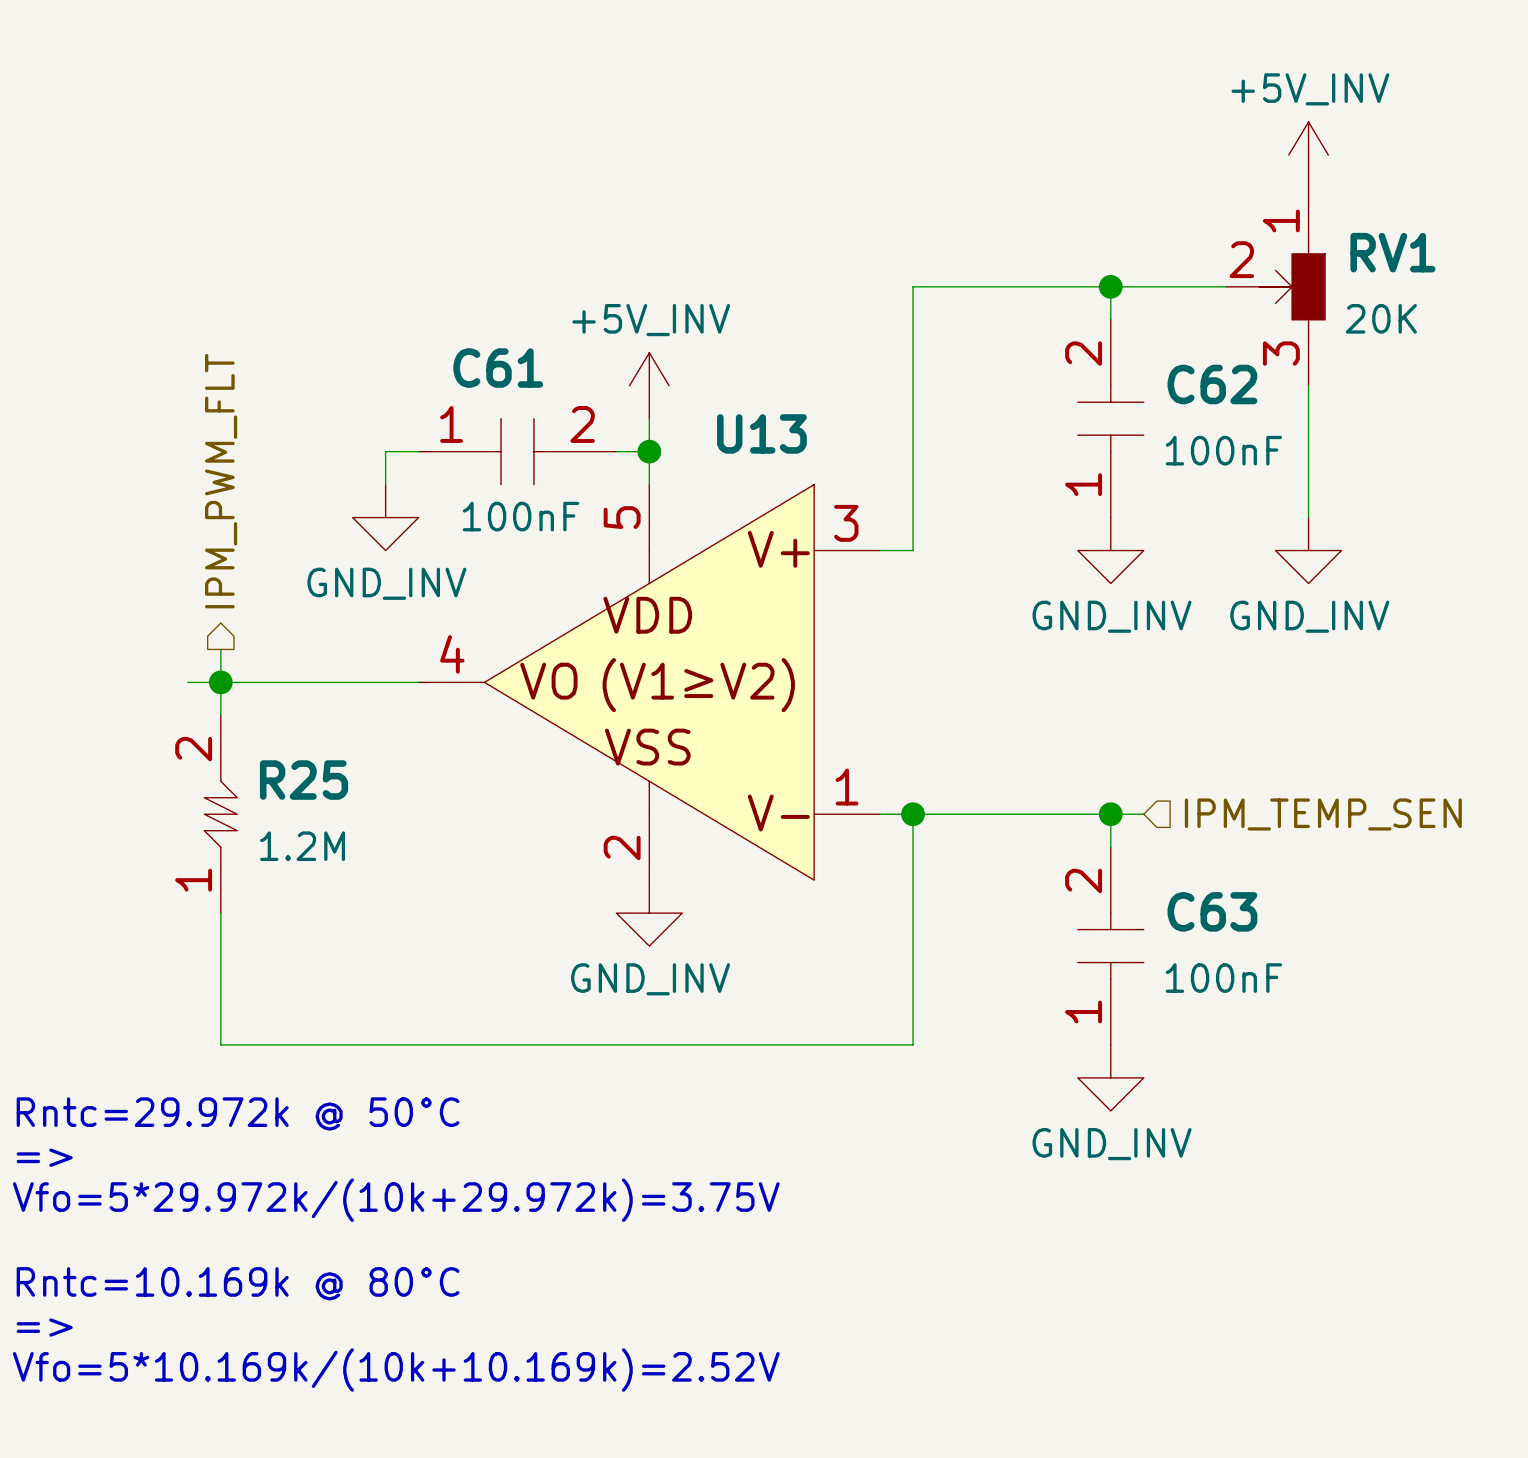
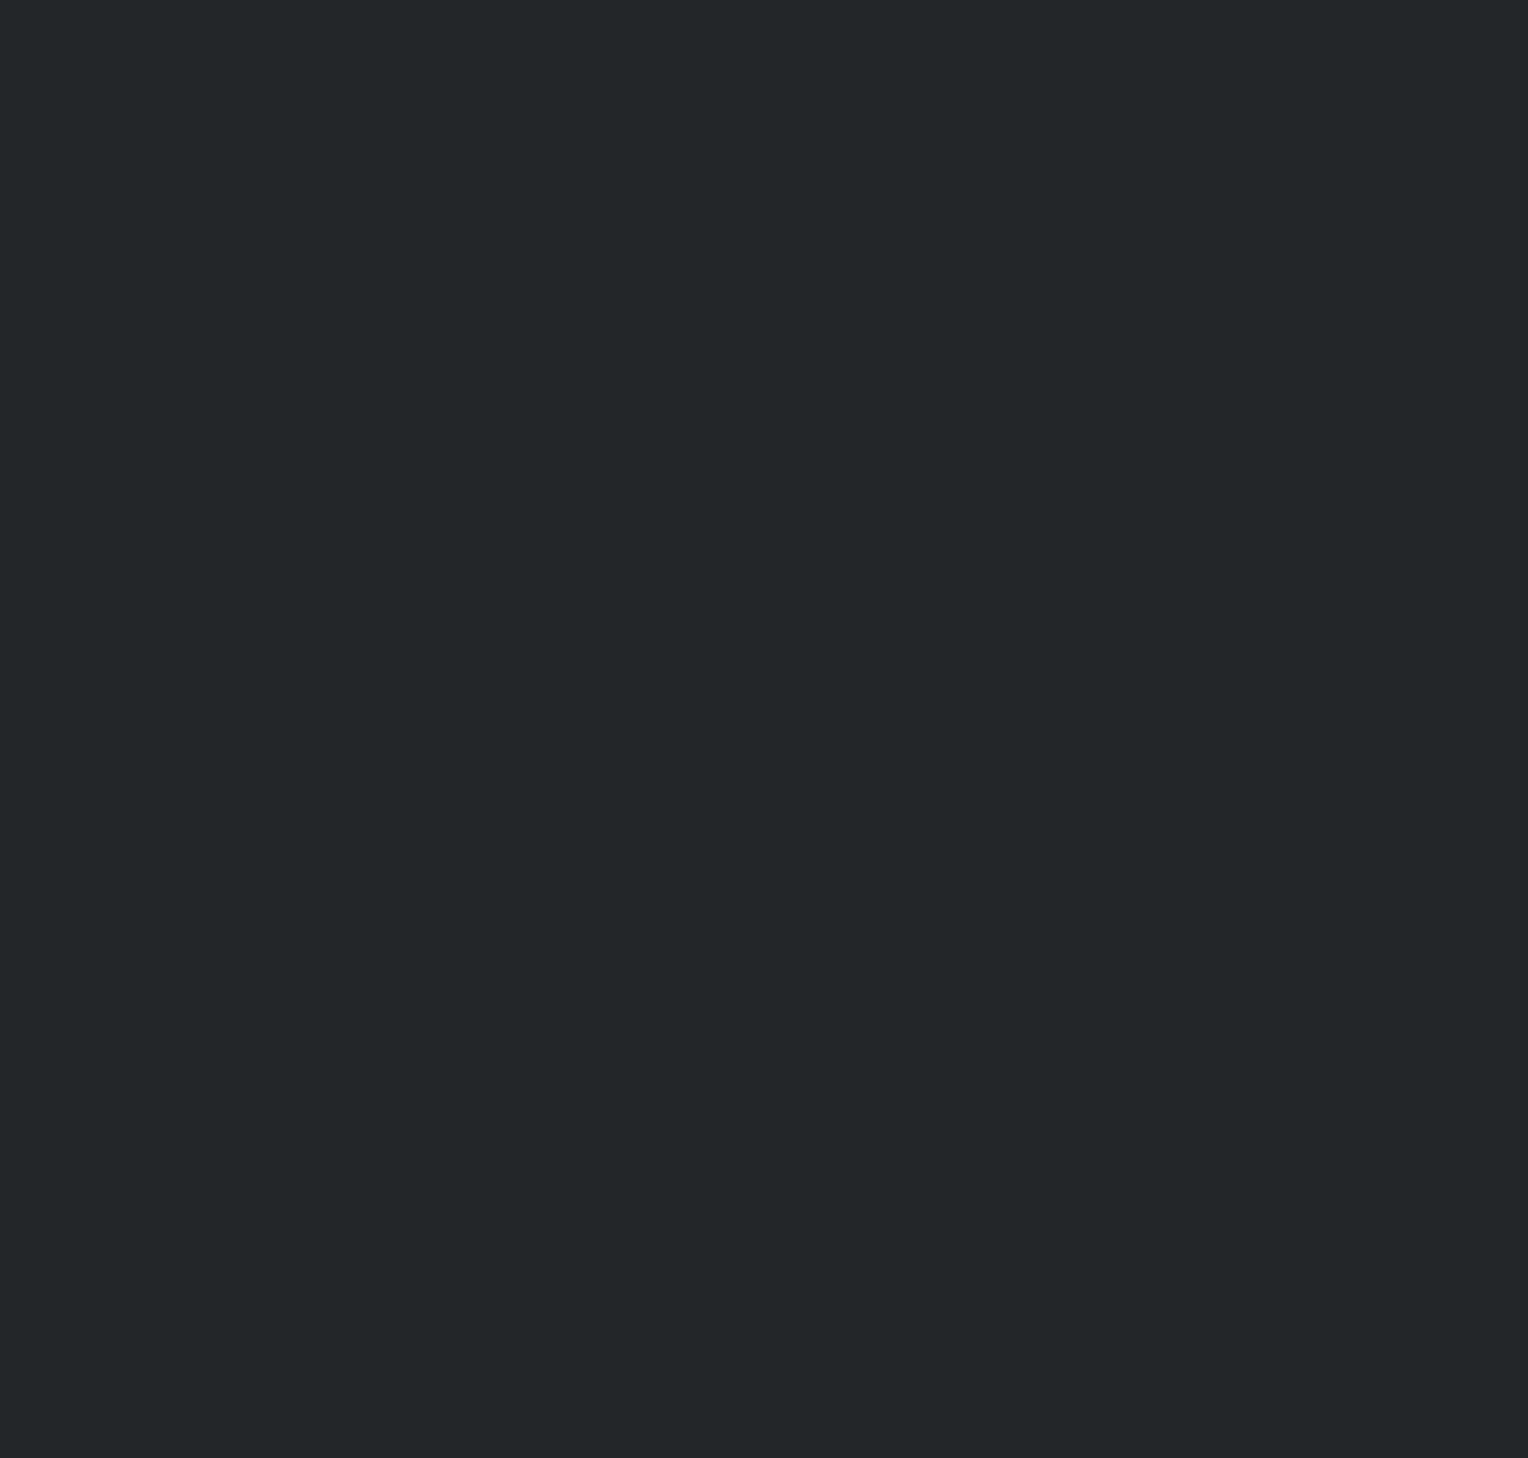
power symbol: +5V_INV (1308, 155) -> none
wire: (1110, 286) (1110, 319) -> none
junction: (1110, 286) -> none
wire: (1226, 286) (913, 286) (913, 550) (880, 550) -> none
RV1: 20K (1275, 286) -> none
power symbol: +5V_INV (649, 385) -> none
wire: (1308, 385) (1308, 517) -> none
wire: (649, 418) (649, 484) -> none
C62: 100nF (1110, 418) -> none
wire: (418, 451) (385, 451) (385, 484) -> none
C61: 100nF (517, 451) -> none
wire: (616, 451) (649, 451) -> none
junction: (649, 451) -> none
hierarchical label: IPM_PWM_FLT (221, 481) -> none
power symbol: GND_INV (385, 517) -> none
power symbol: GND_INV (1110, 550) -> none
power symbol: GND_INV (1308, 550) -> none
wire: (220, 649) (220, 715) -> none
wire: (187, 682) (418, 682) -> none
junction: (220, 682) -> none
U13: (649, 682) -> none
R25: 1.2M (220, 814) -> none
wire: (880, 814) (1143, 814) -> none
wire: (913, 814) (913, 1044) (220, 1044) (220, 913) -> none
junction: (913, 814) -> none
wire: (1110, 814) (1110, 847) -> none
junction: (1110, 814) -> none
hierarchical label: IPM_TEMP_SEN (1323, 814) -> none
power symbol: GND_INV (649, 913) -> none
C63: 100nF (1110, 946) -> none
power symbol: GND_INV (1110, 1077) -> none
text: Rntc=29.972k @ 50°C (238, 1114) -> none
text: => (44, 1157) -> none
text: Vfo=5*29.972k/(10k+29.972k)=3.75V (396, 1200) -> none
text: Rntc=10.169k @ 80°C (238, 1283) -> none
text: => (44, 1327) -> none
text: Vfo=5*10.169k/(10k+10.169k)=2.52V (396, 1370) -> none

